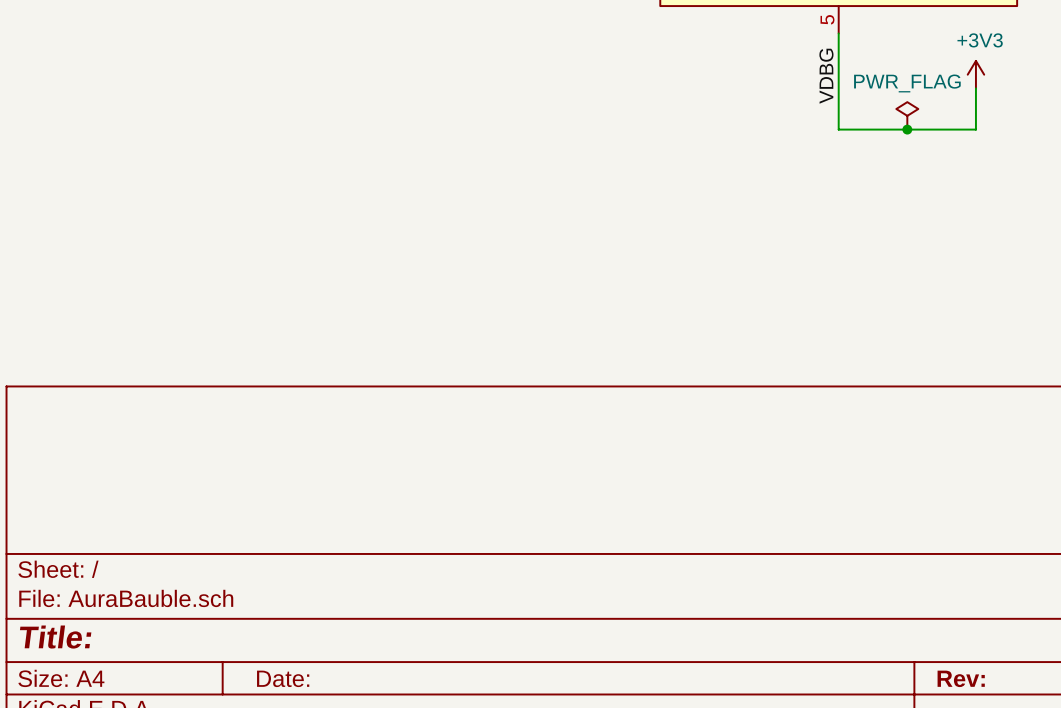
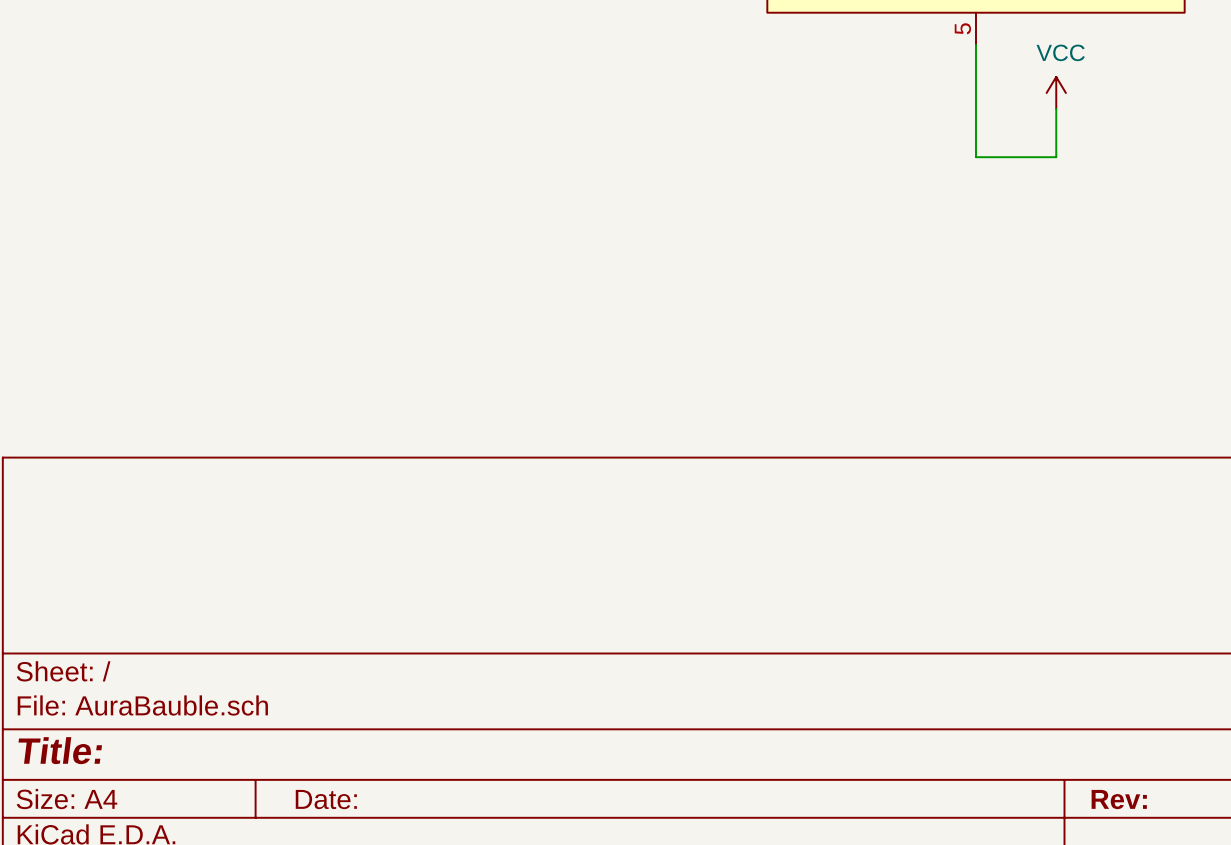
power symbol: none -> VCC (1056, 92)
power symbol: +3V3 (975, 74) -> none
label: VDBG (826, 76) -> none
wire: (975, 88) (975, 129) (907, 129) -> (1056, 109) (1056, 157)
power symbol: PWR_FLAG (907, 115) -> none
junction: (907, 129) -> none

